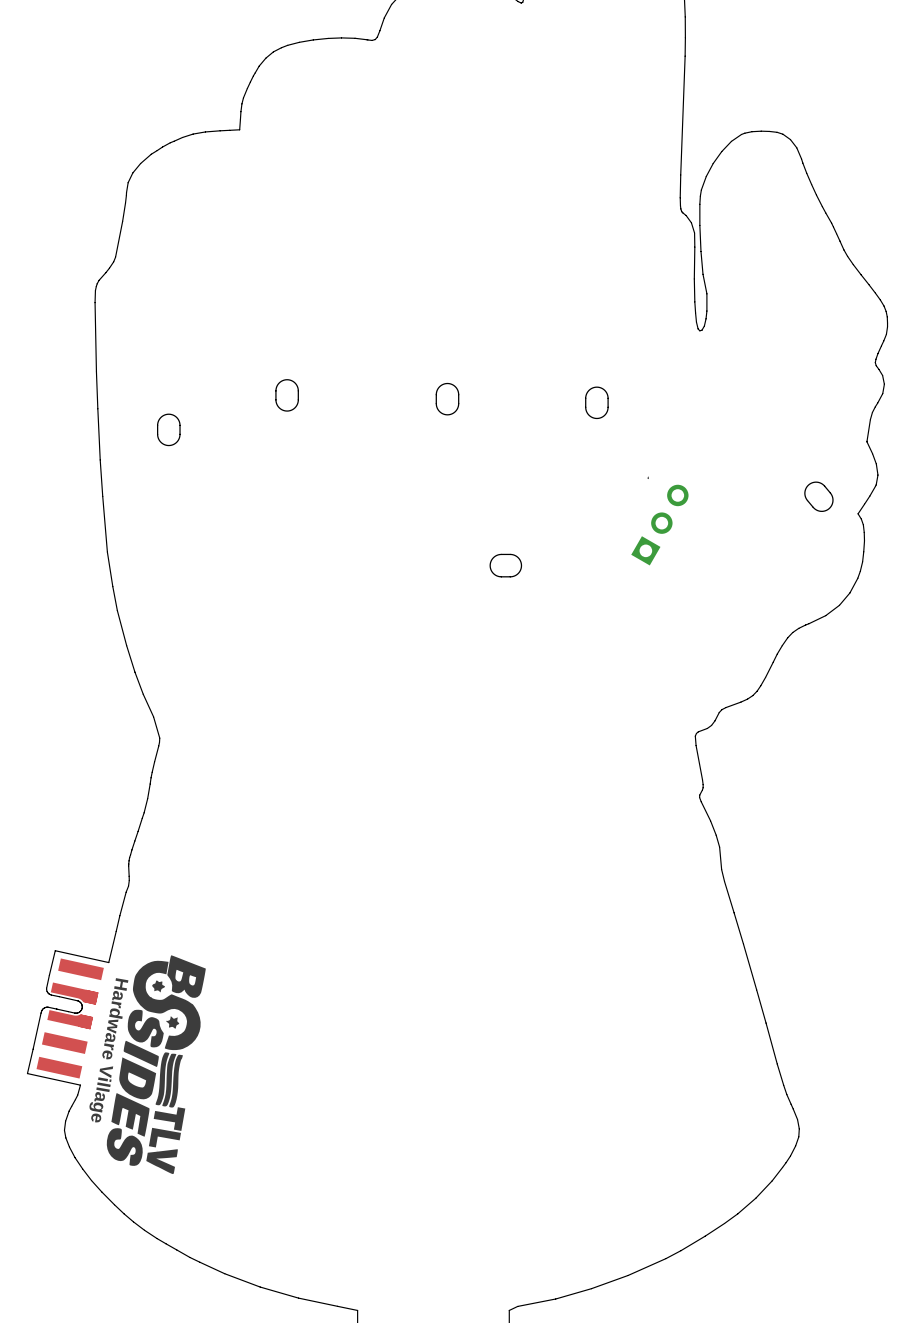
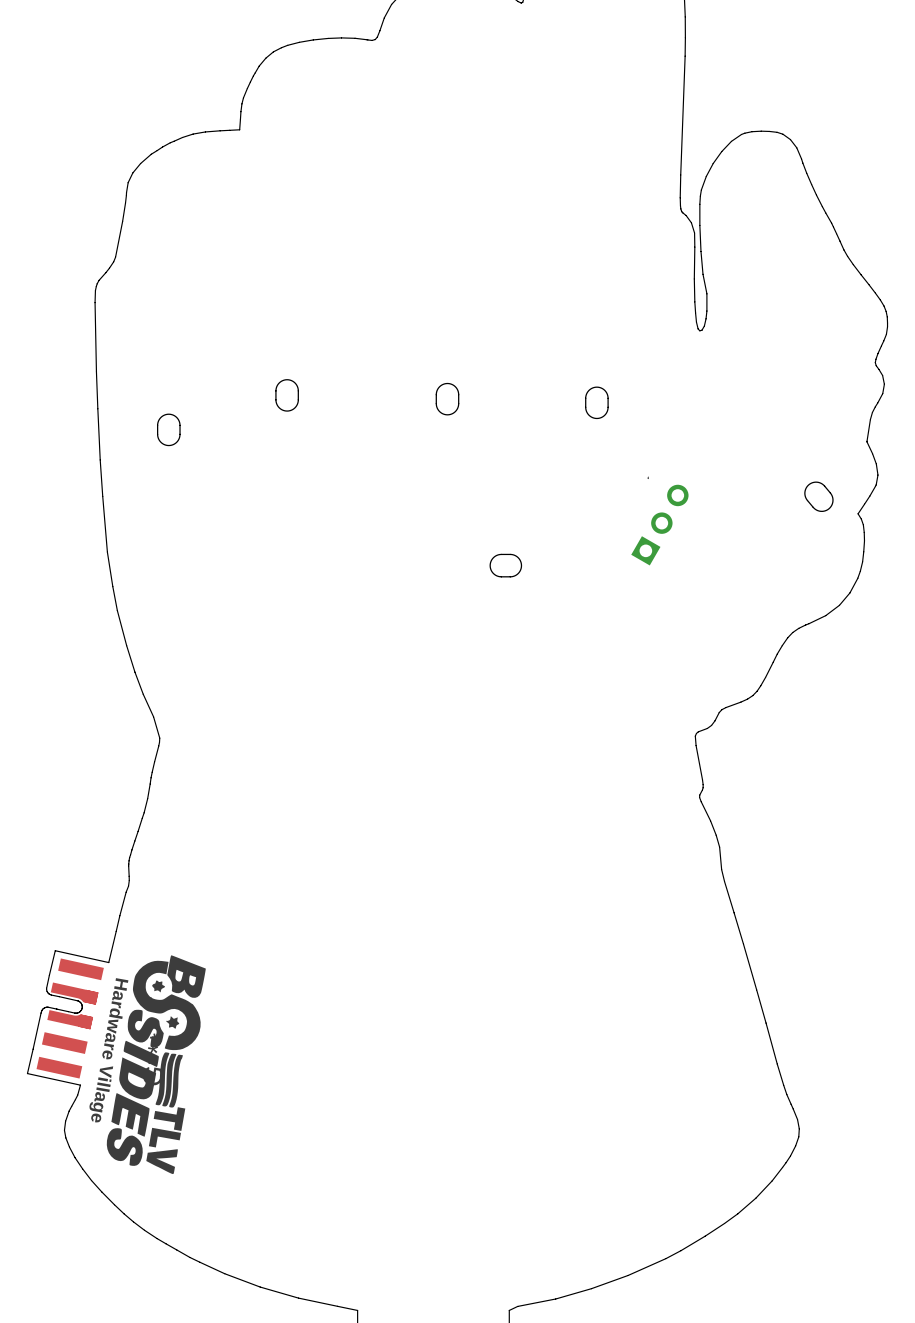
drawing: [106, 955, 206, 1175] -> none
part: none -> (156, 1064)

